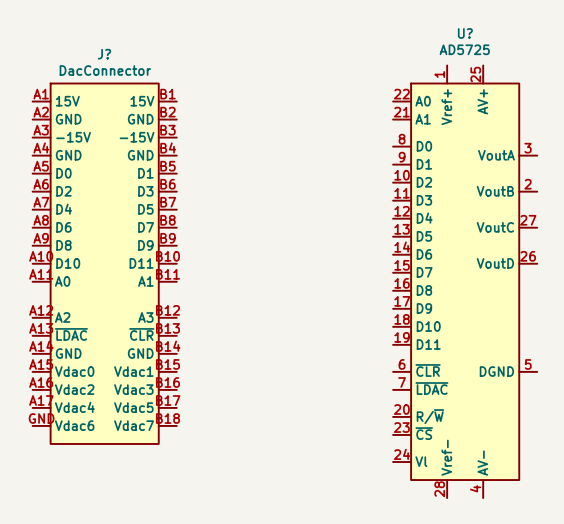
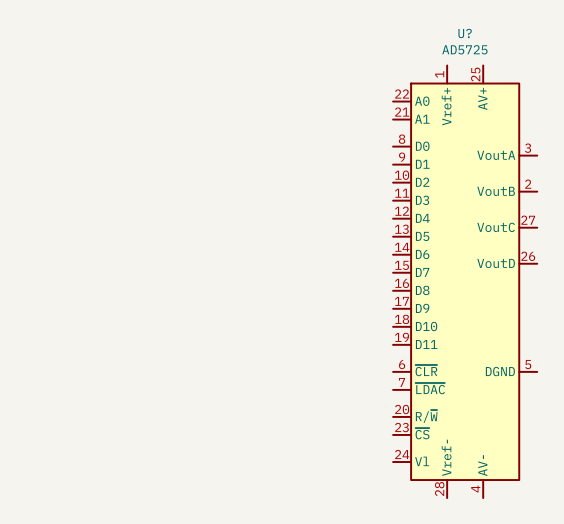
J?: DacConnector (104, 263) -> none

